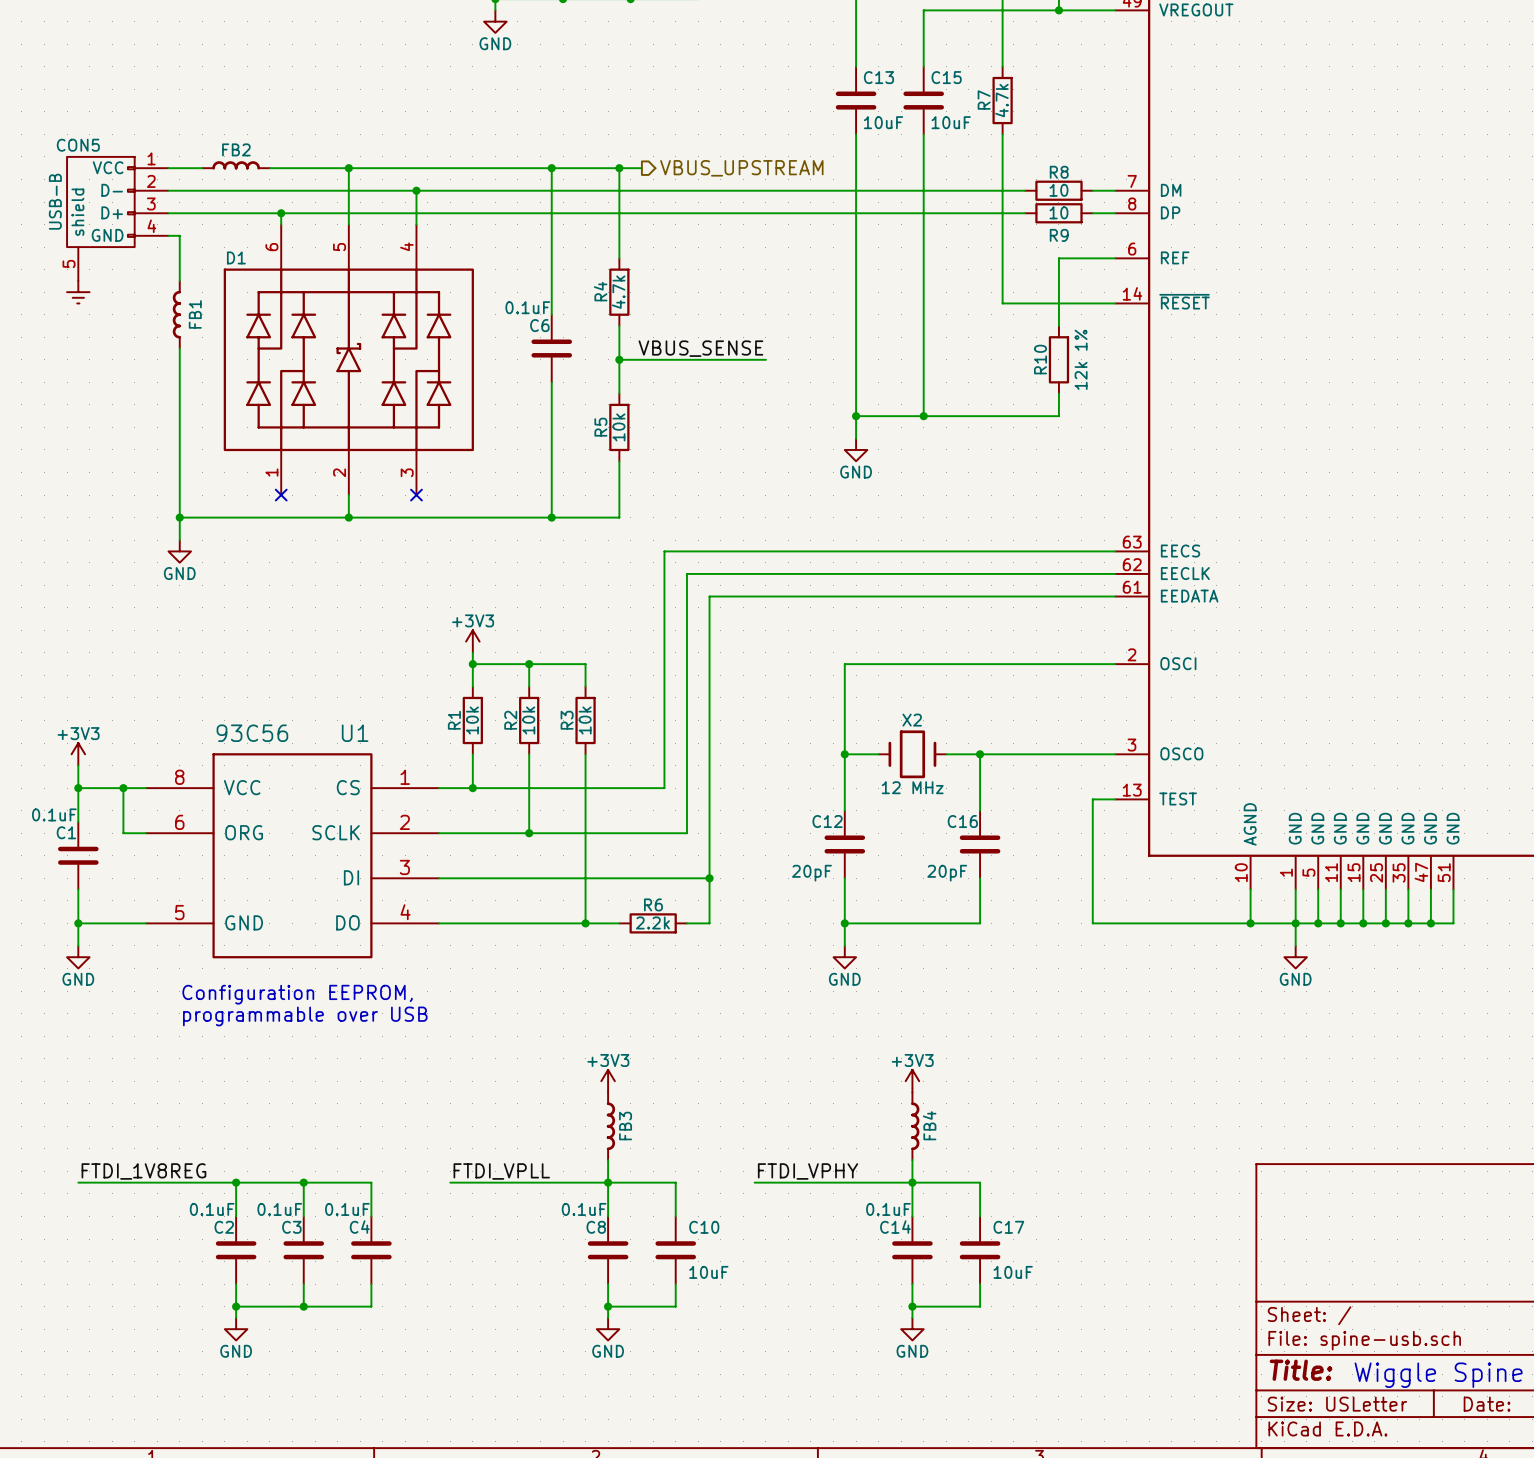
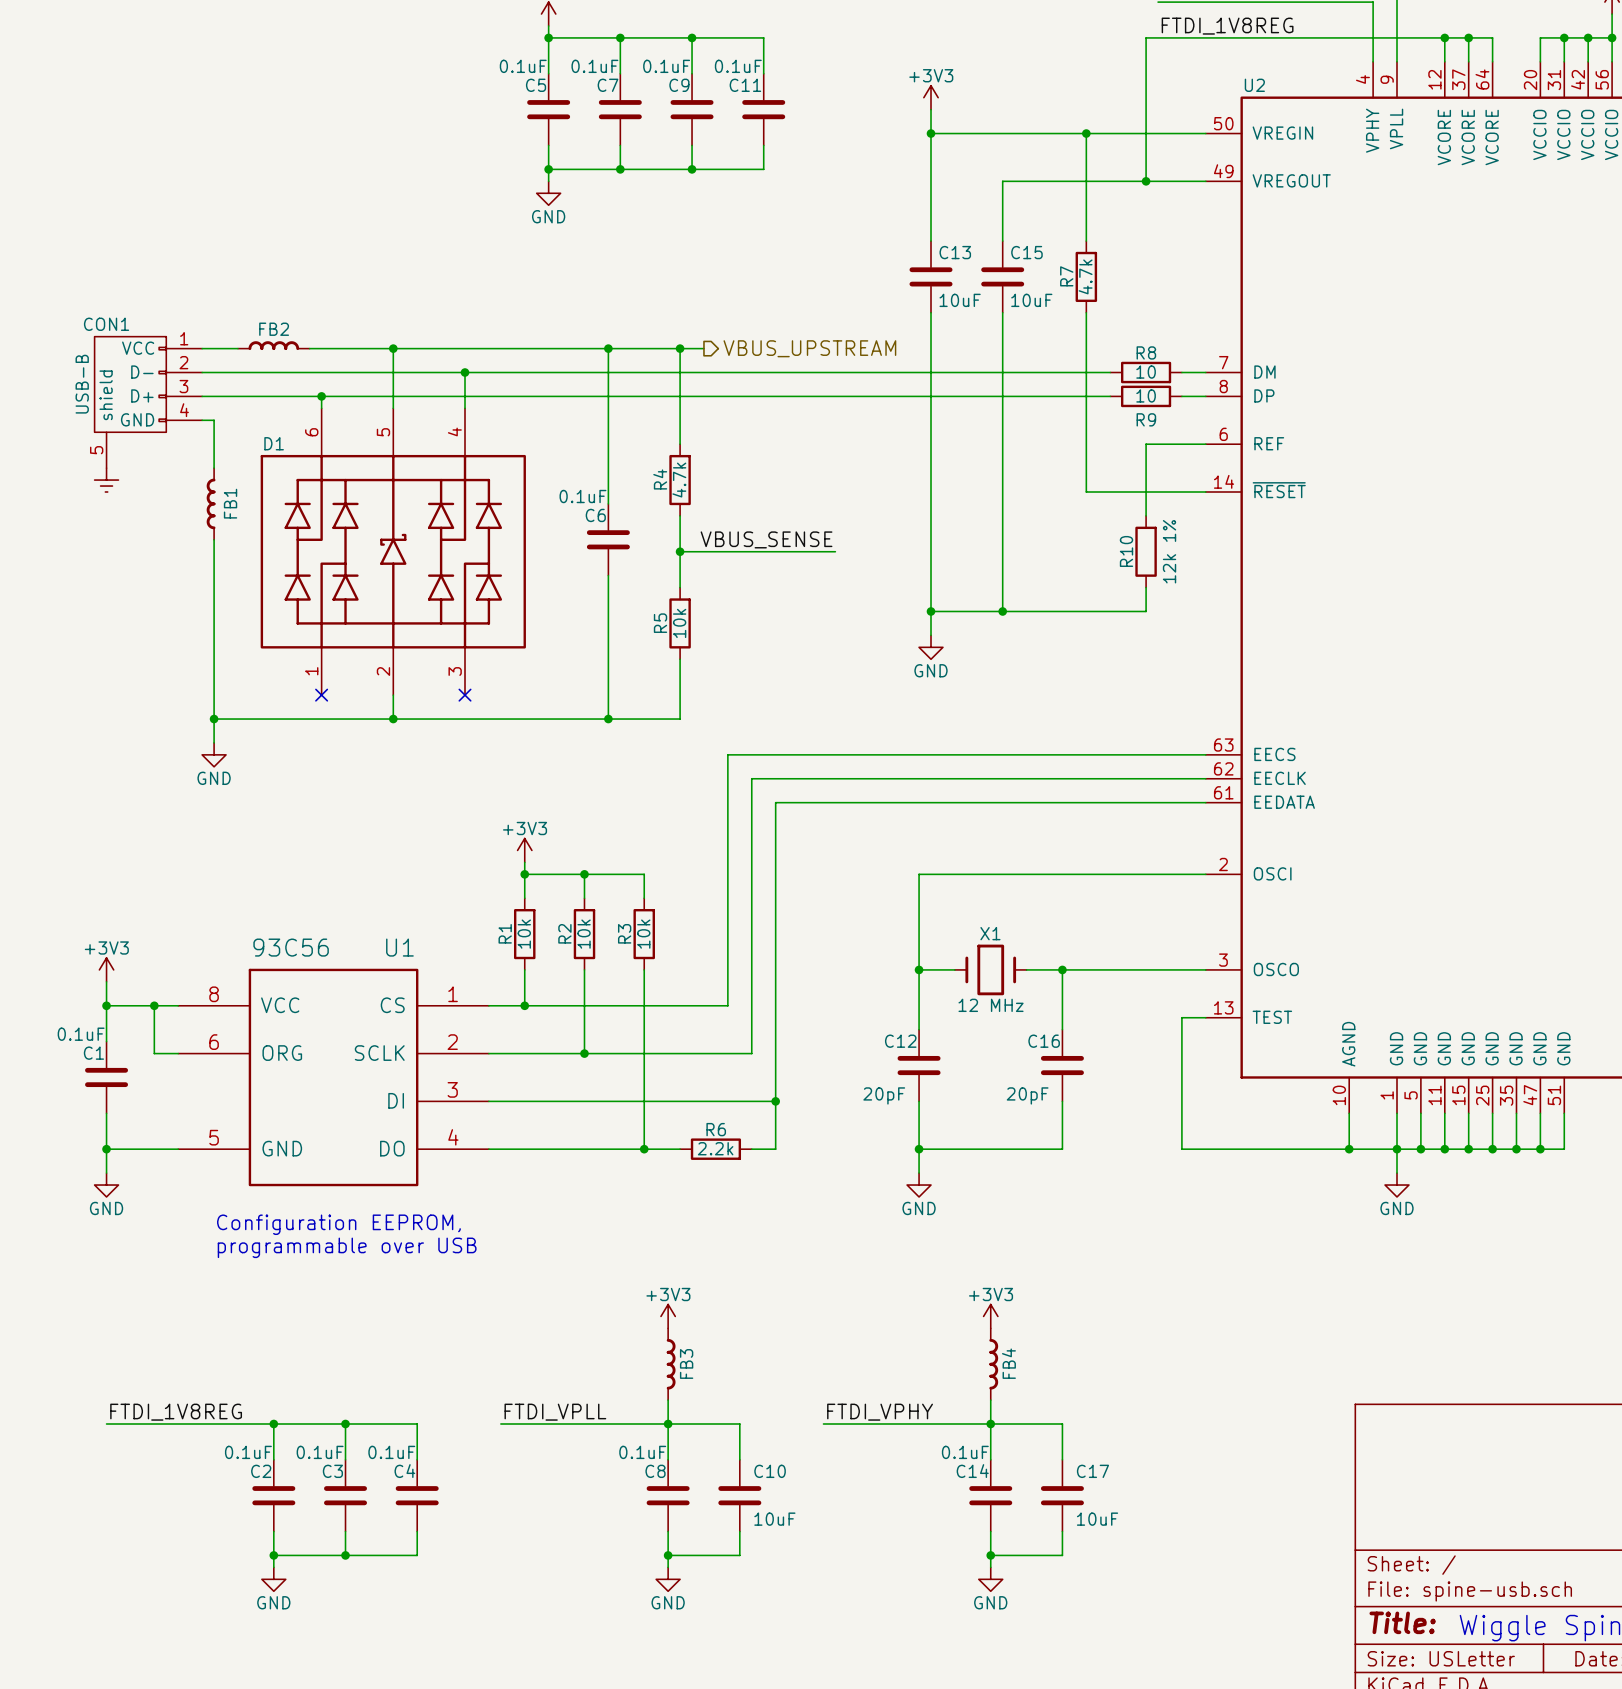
CON5 name: CON5 (78, 145) -> CON1 (106, 324)
X2 name: X2 (912, 720) -> X1 (990, 933)

